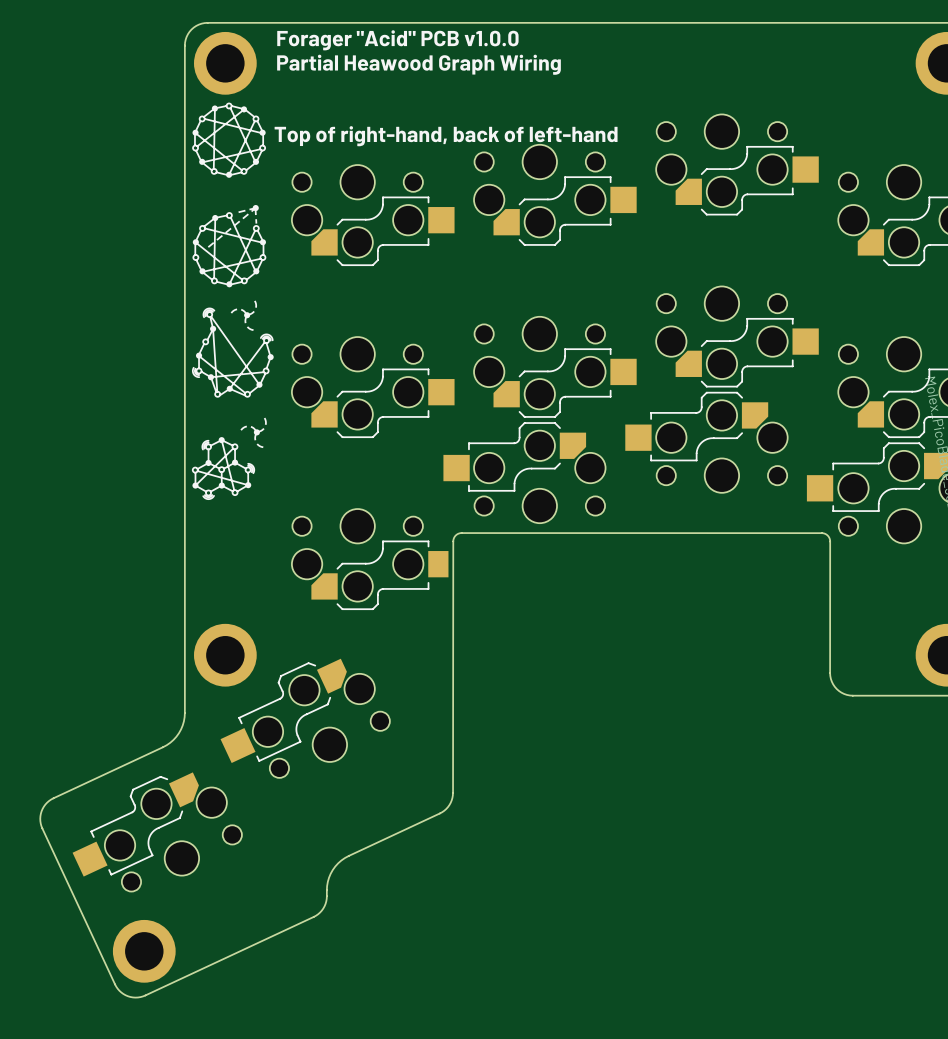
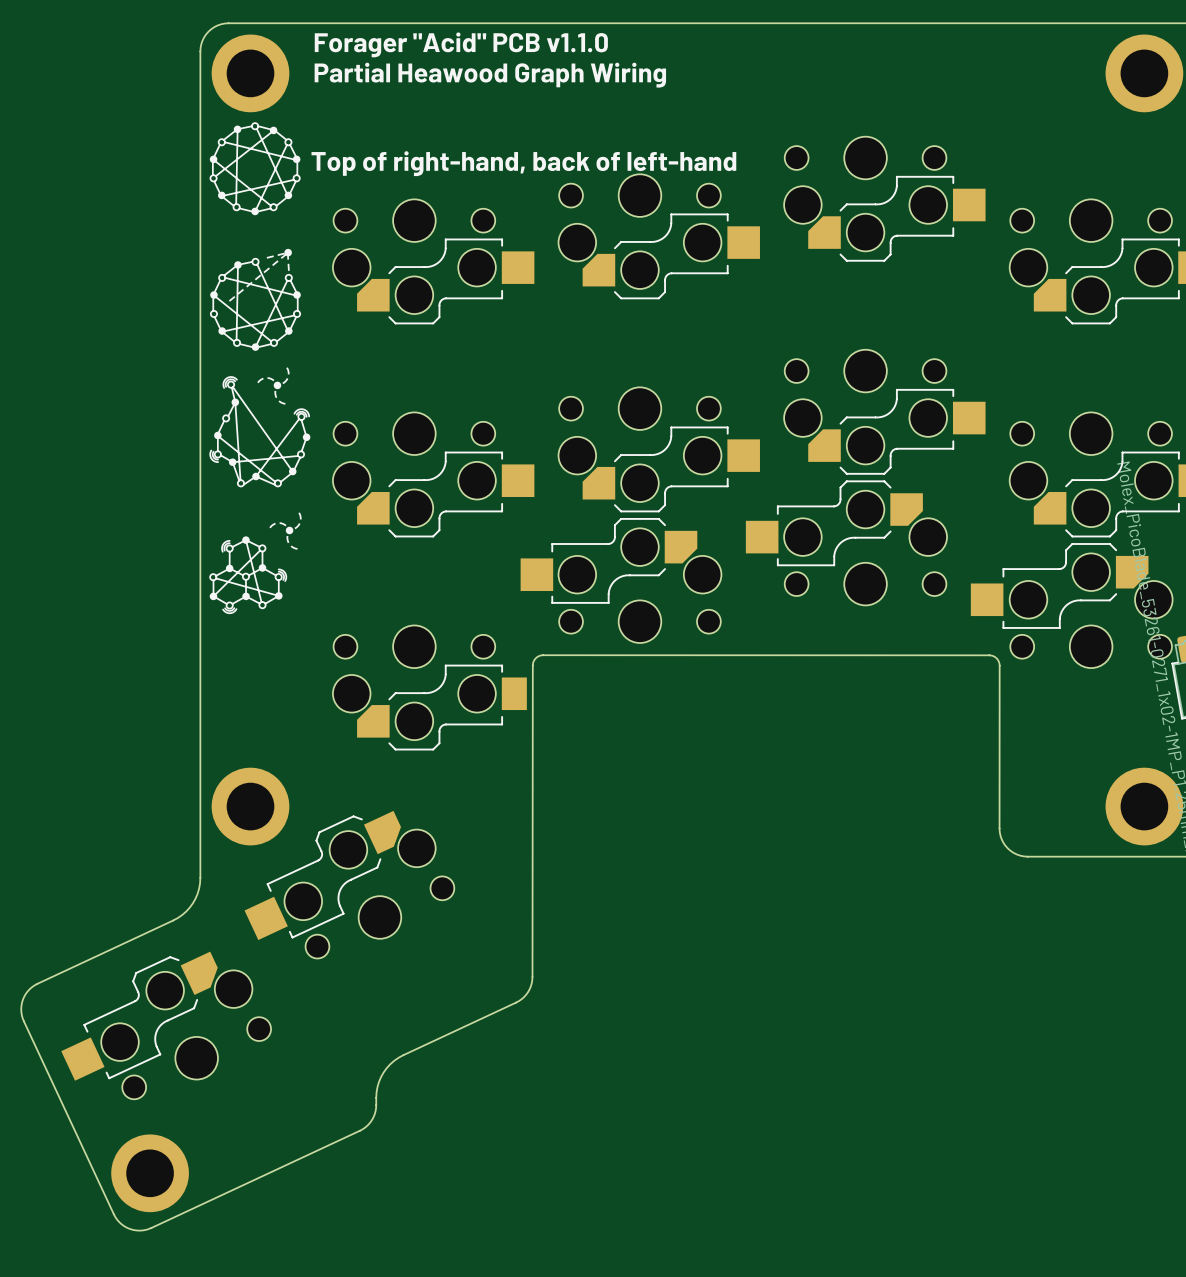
text: Forager "Acid" PCB v1.0.0 (397, 40) -> Forager "Acid" PCB v1.1.0 (461, 44)

